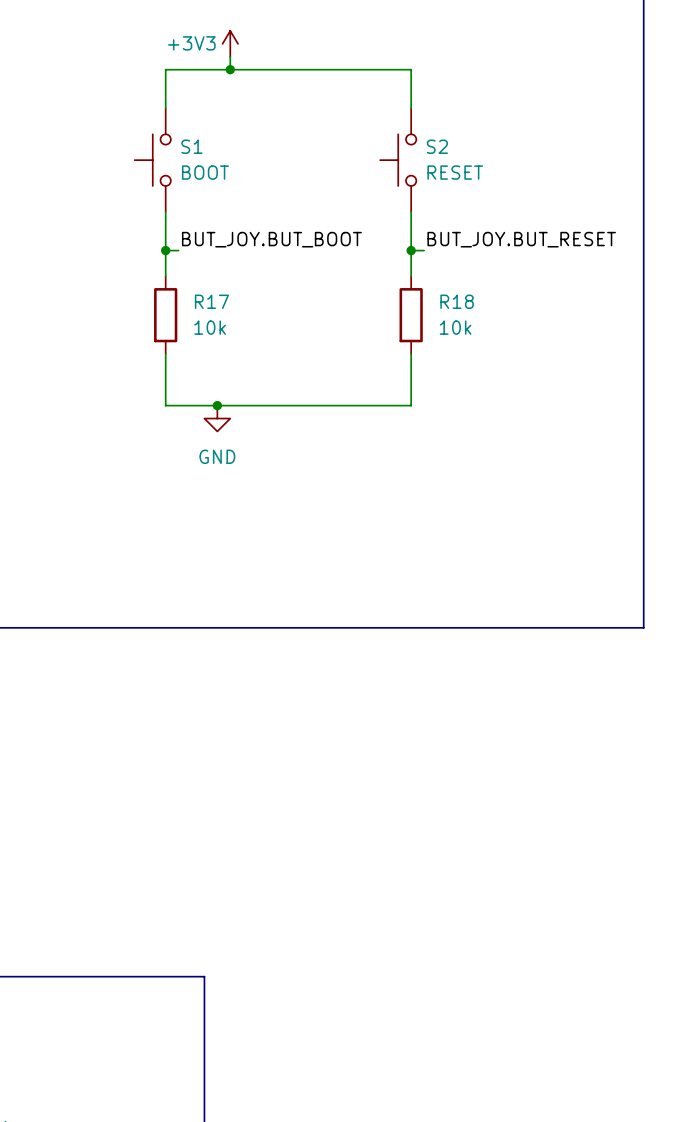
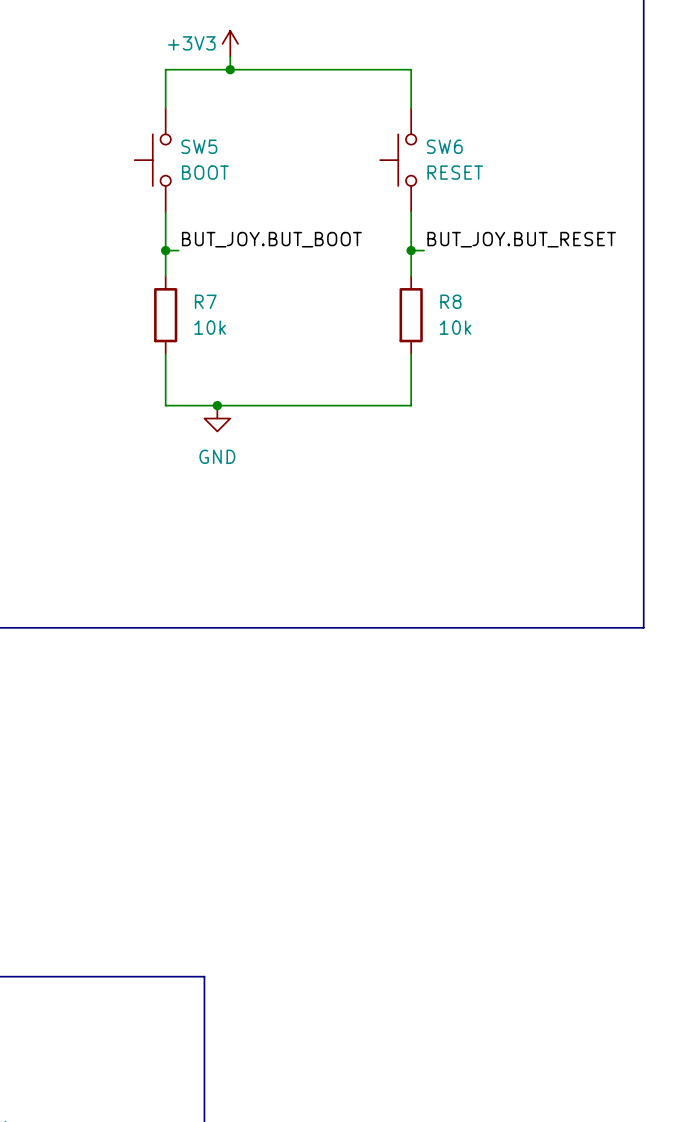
S1 name: S1 (191, 146) -> SW5 (199, 146)
S2 name: S2 (437, 146) -> SW6 (444, 146)
R17 name: R17 (211, 301) -> R7 (205, 301)
R18 name: R18 (457, 301) -> R8 (450, 301)

